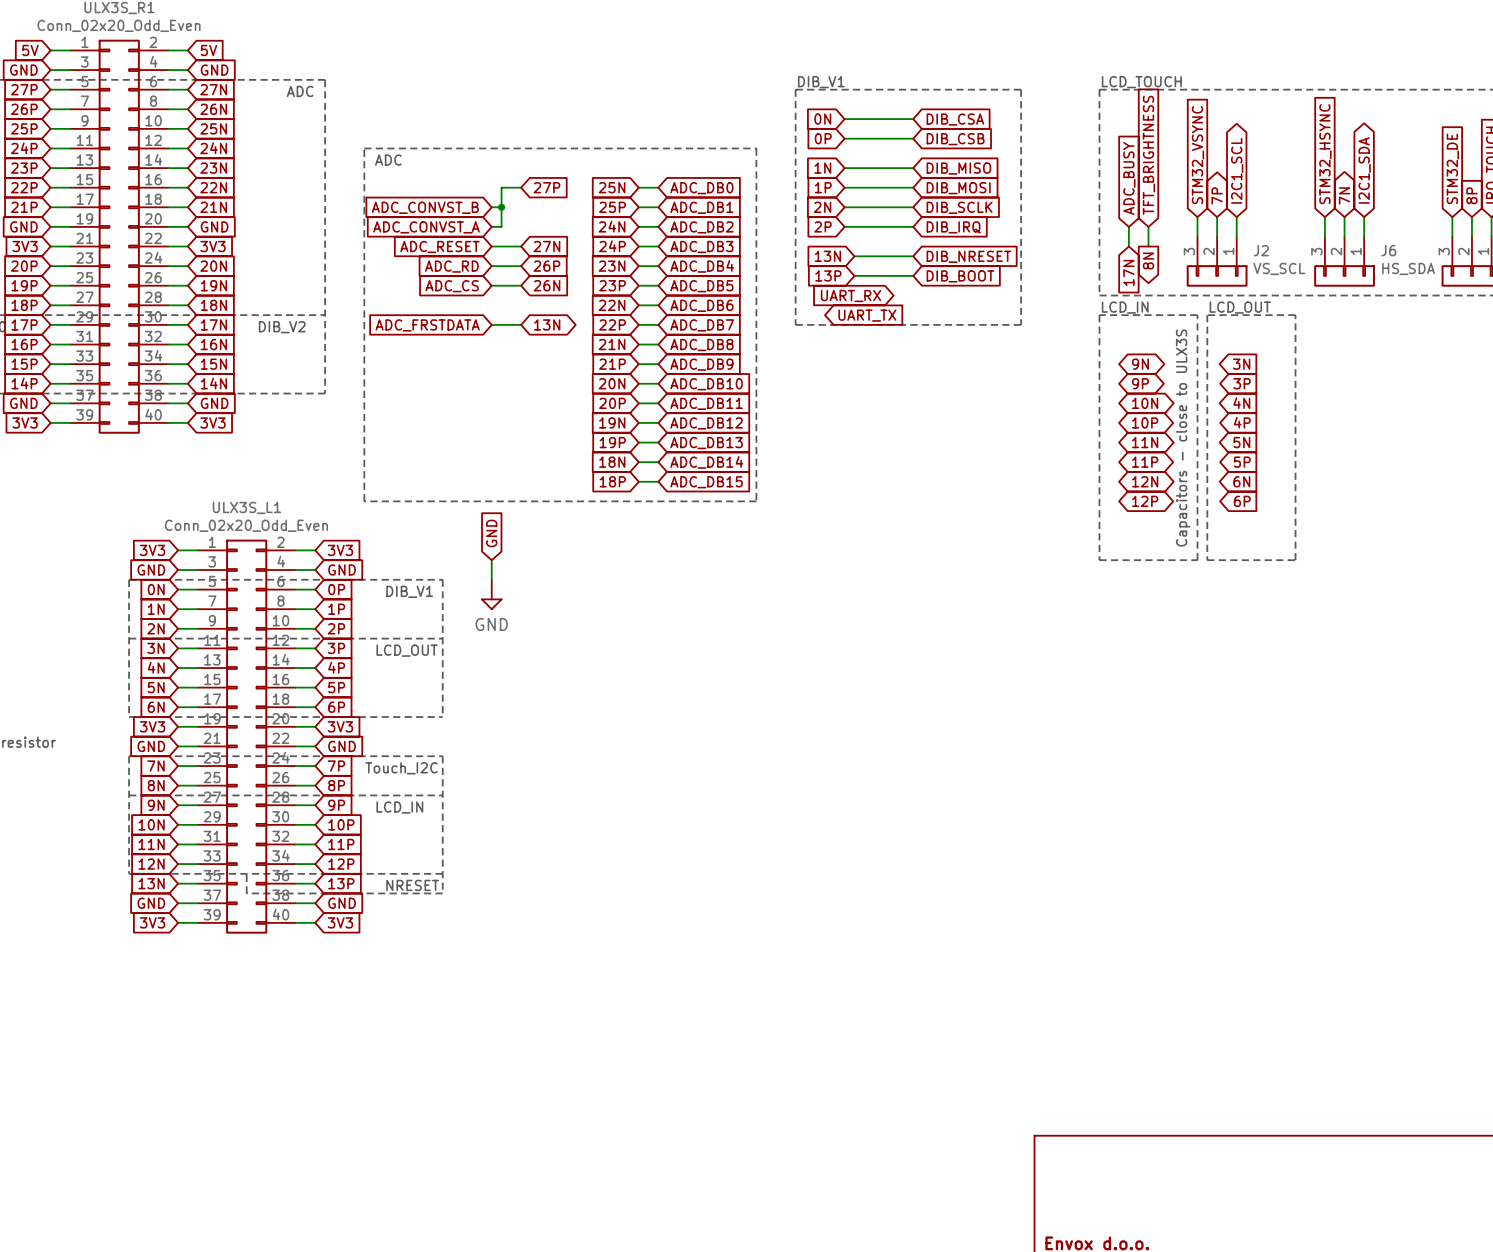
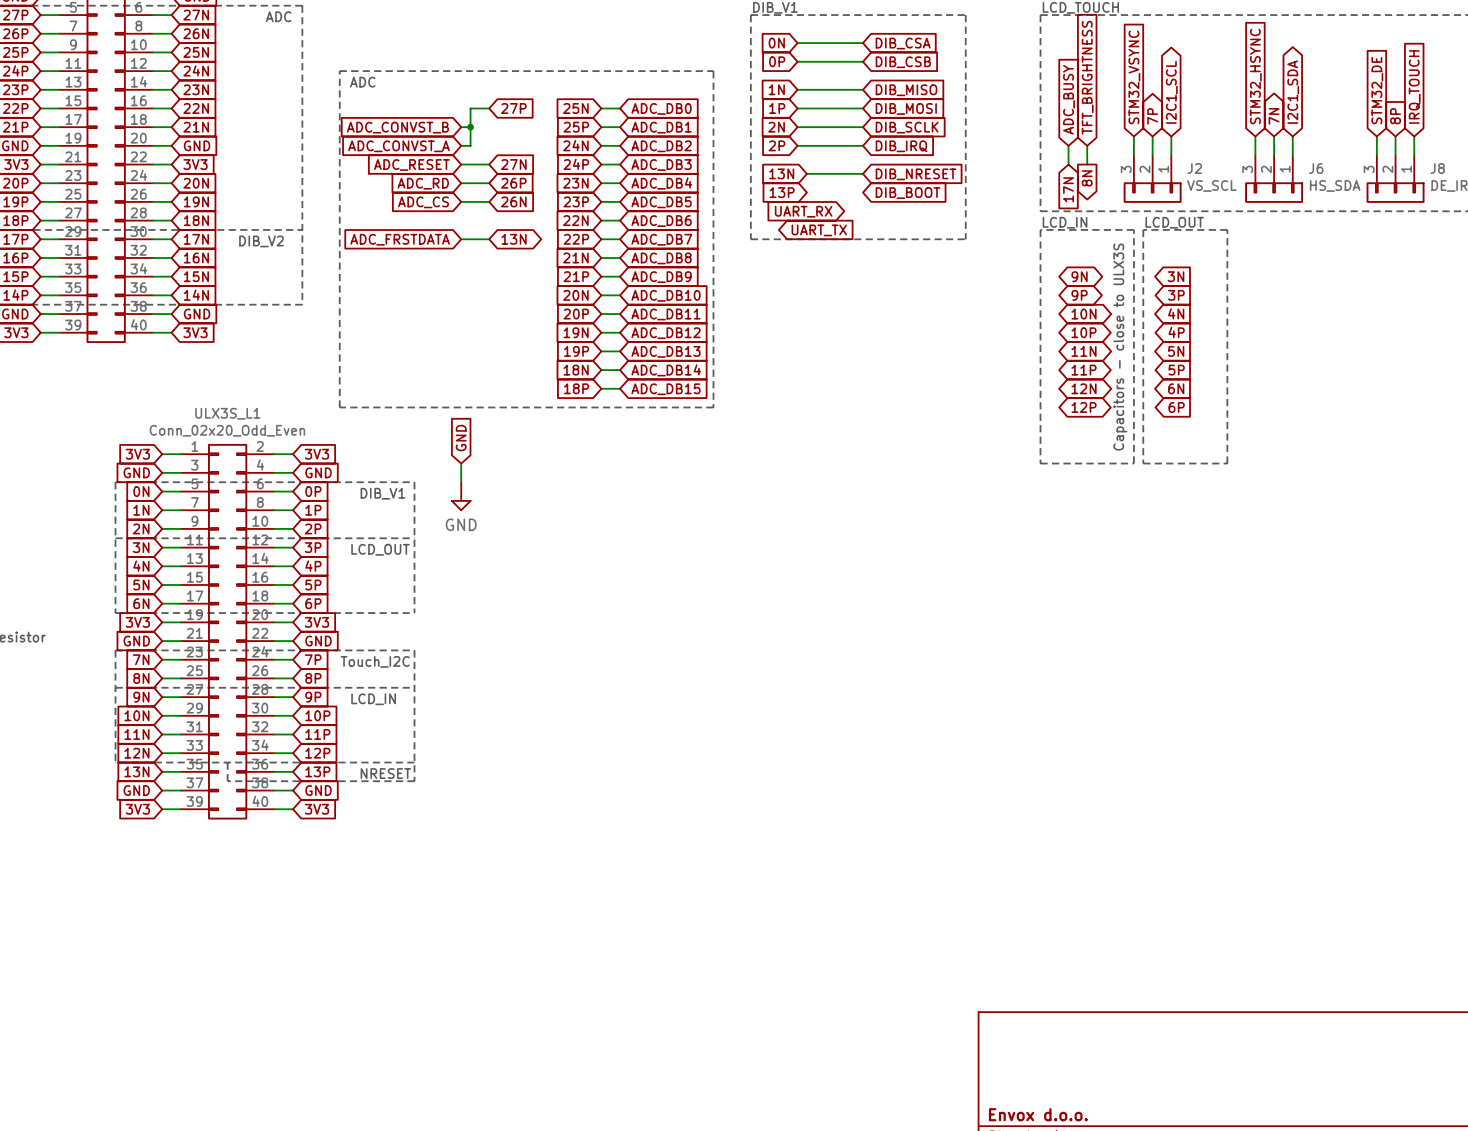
wire: (854, 275) (913, 275) -> none

